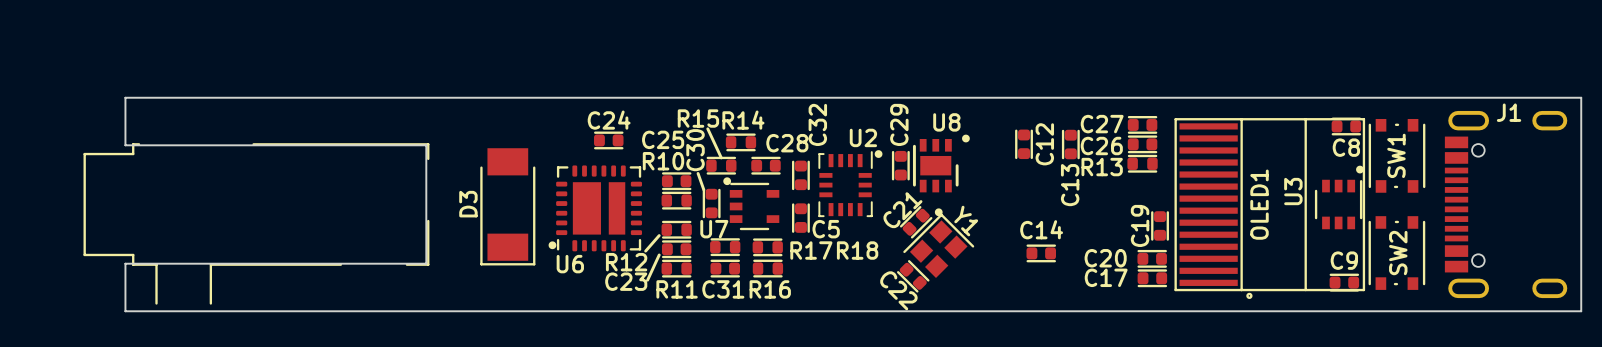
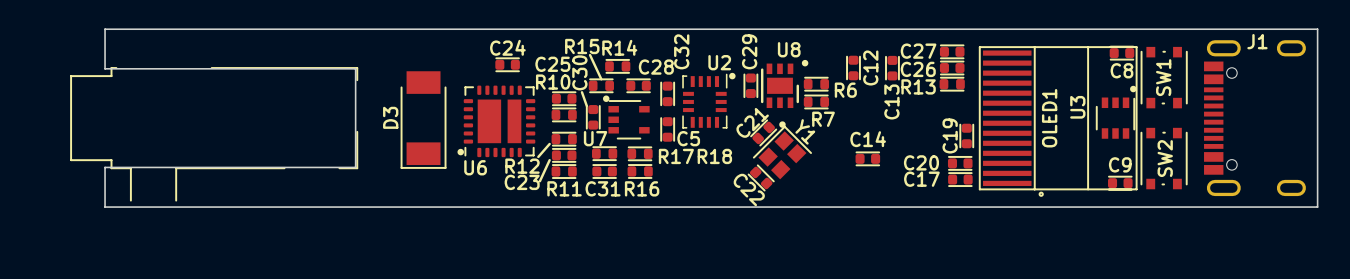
R6: none -> (816, 84)
R7: none -> (816, 101)

